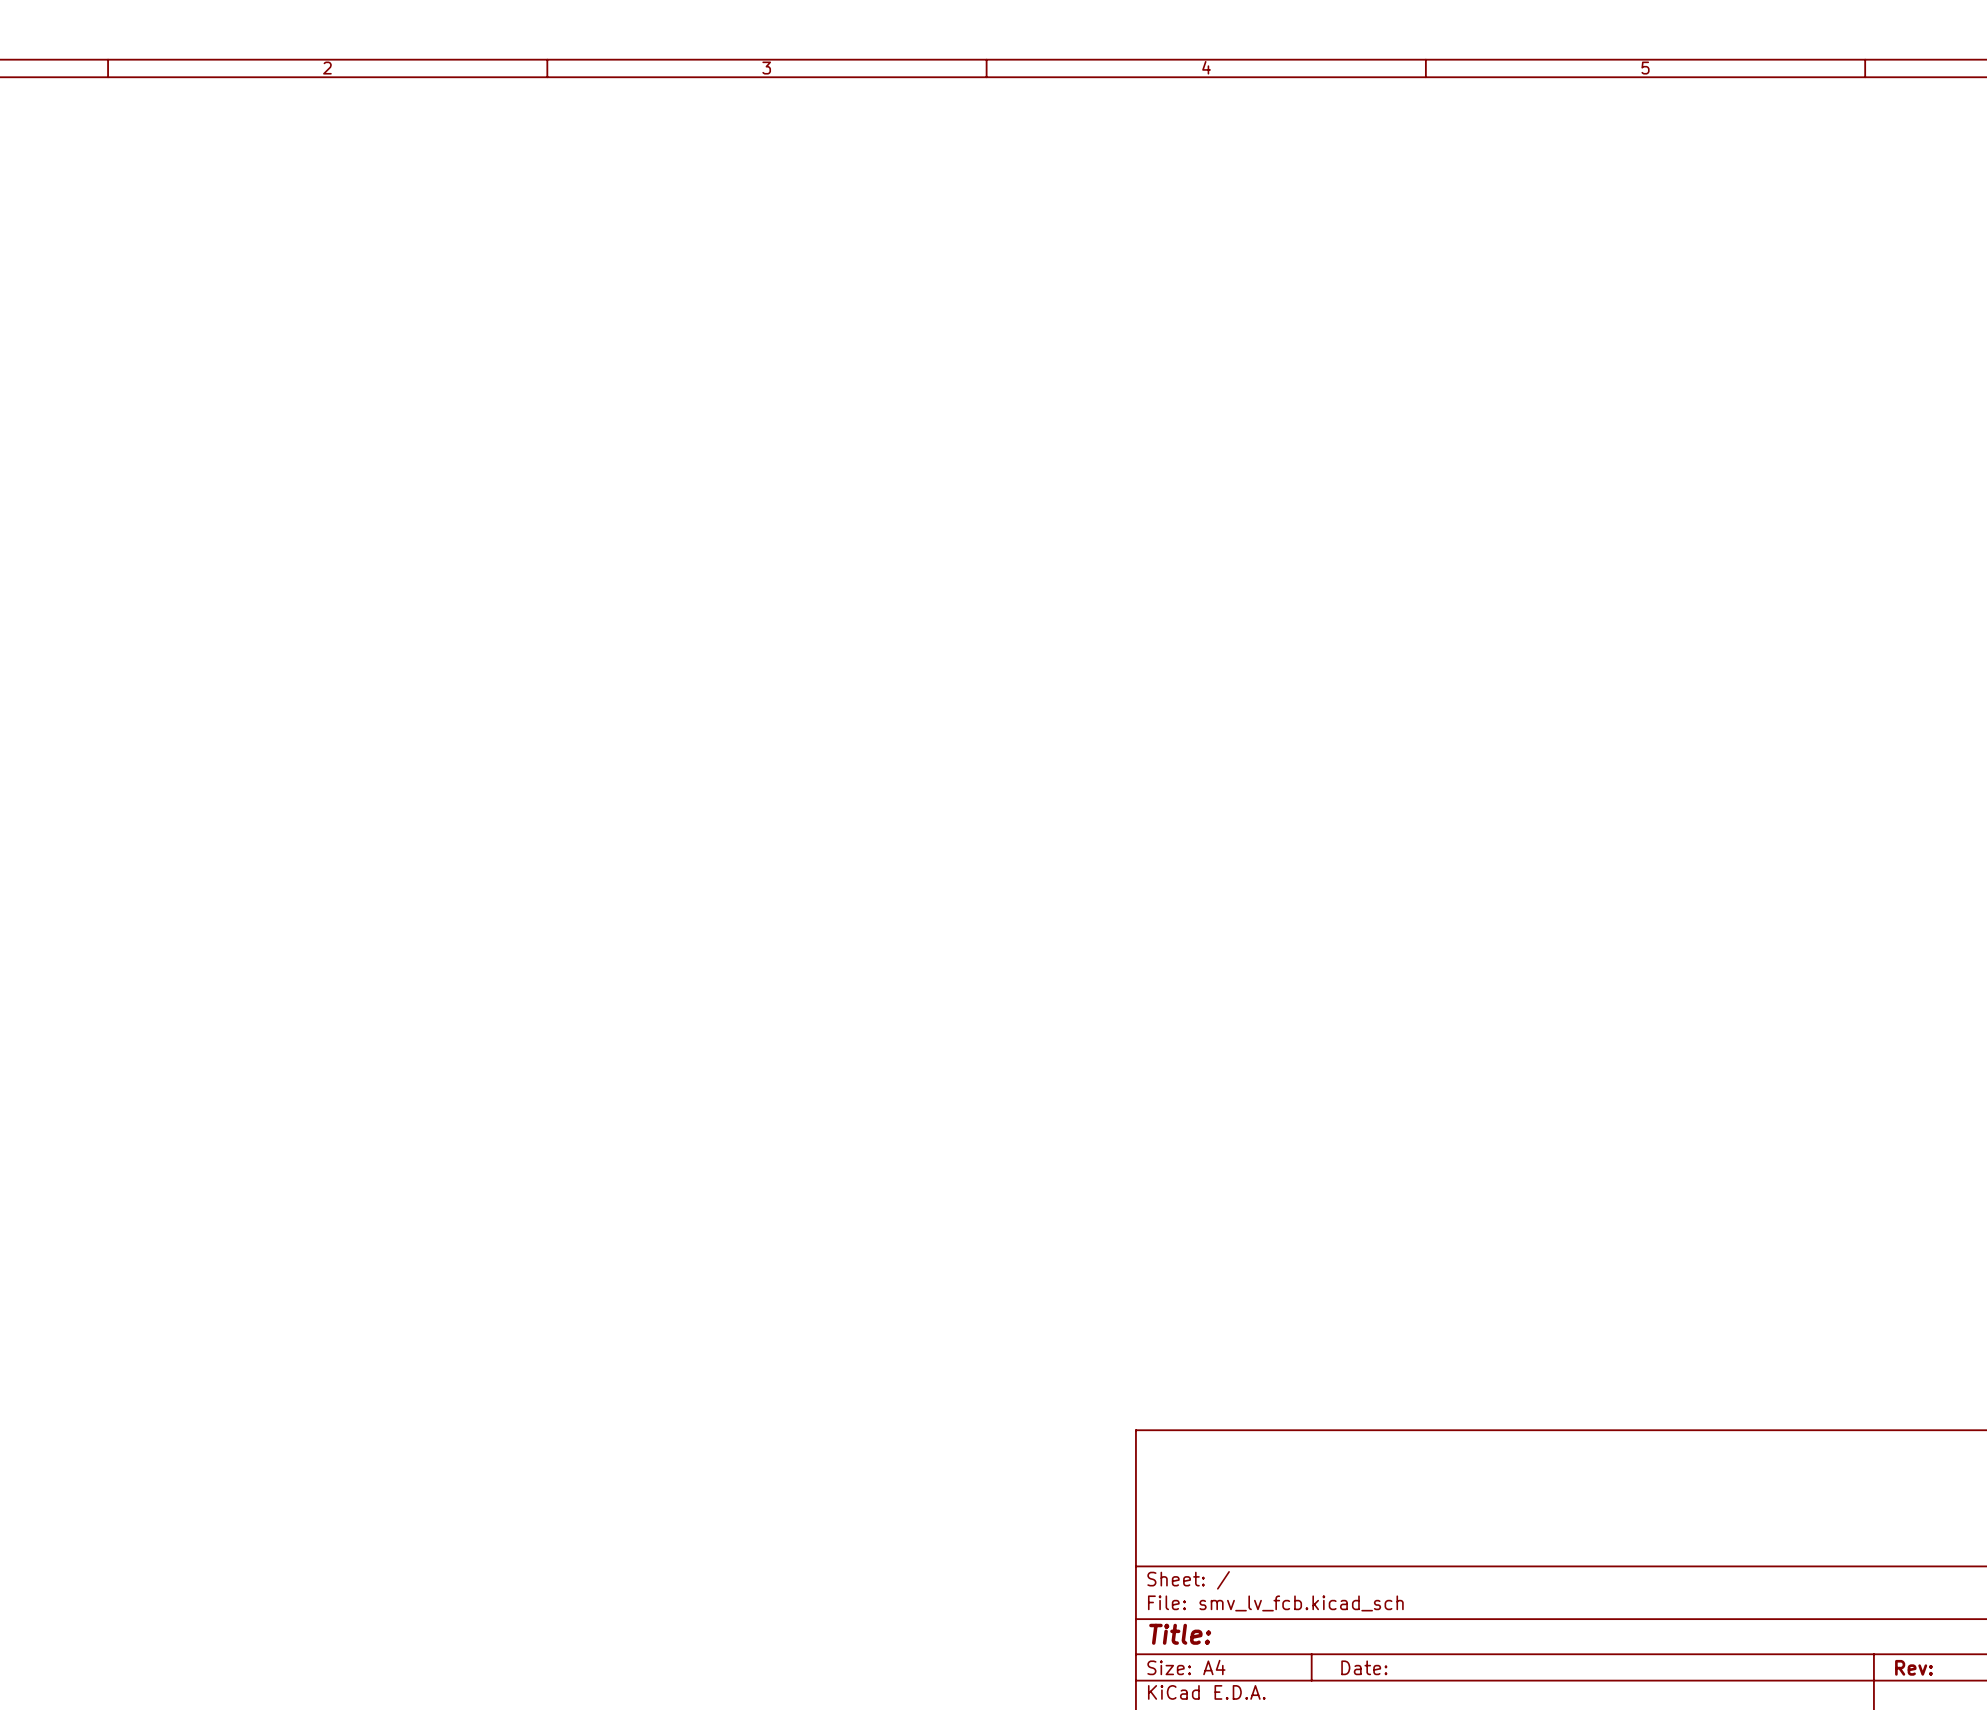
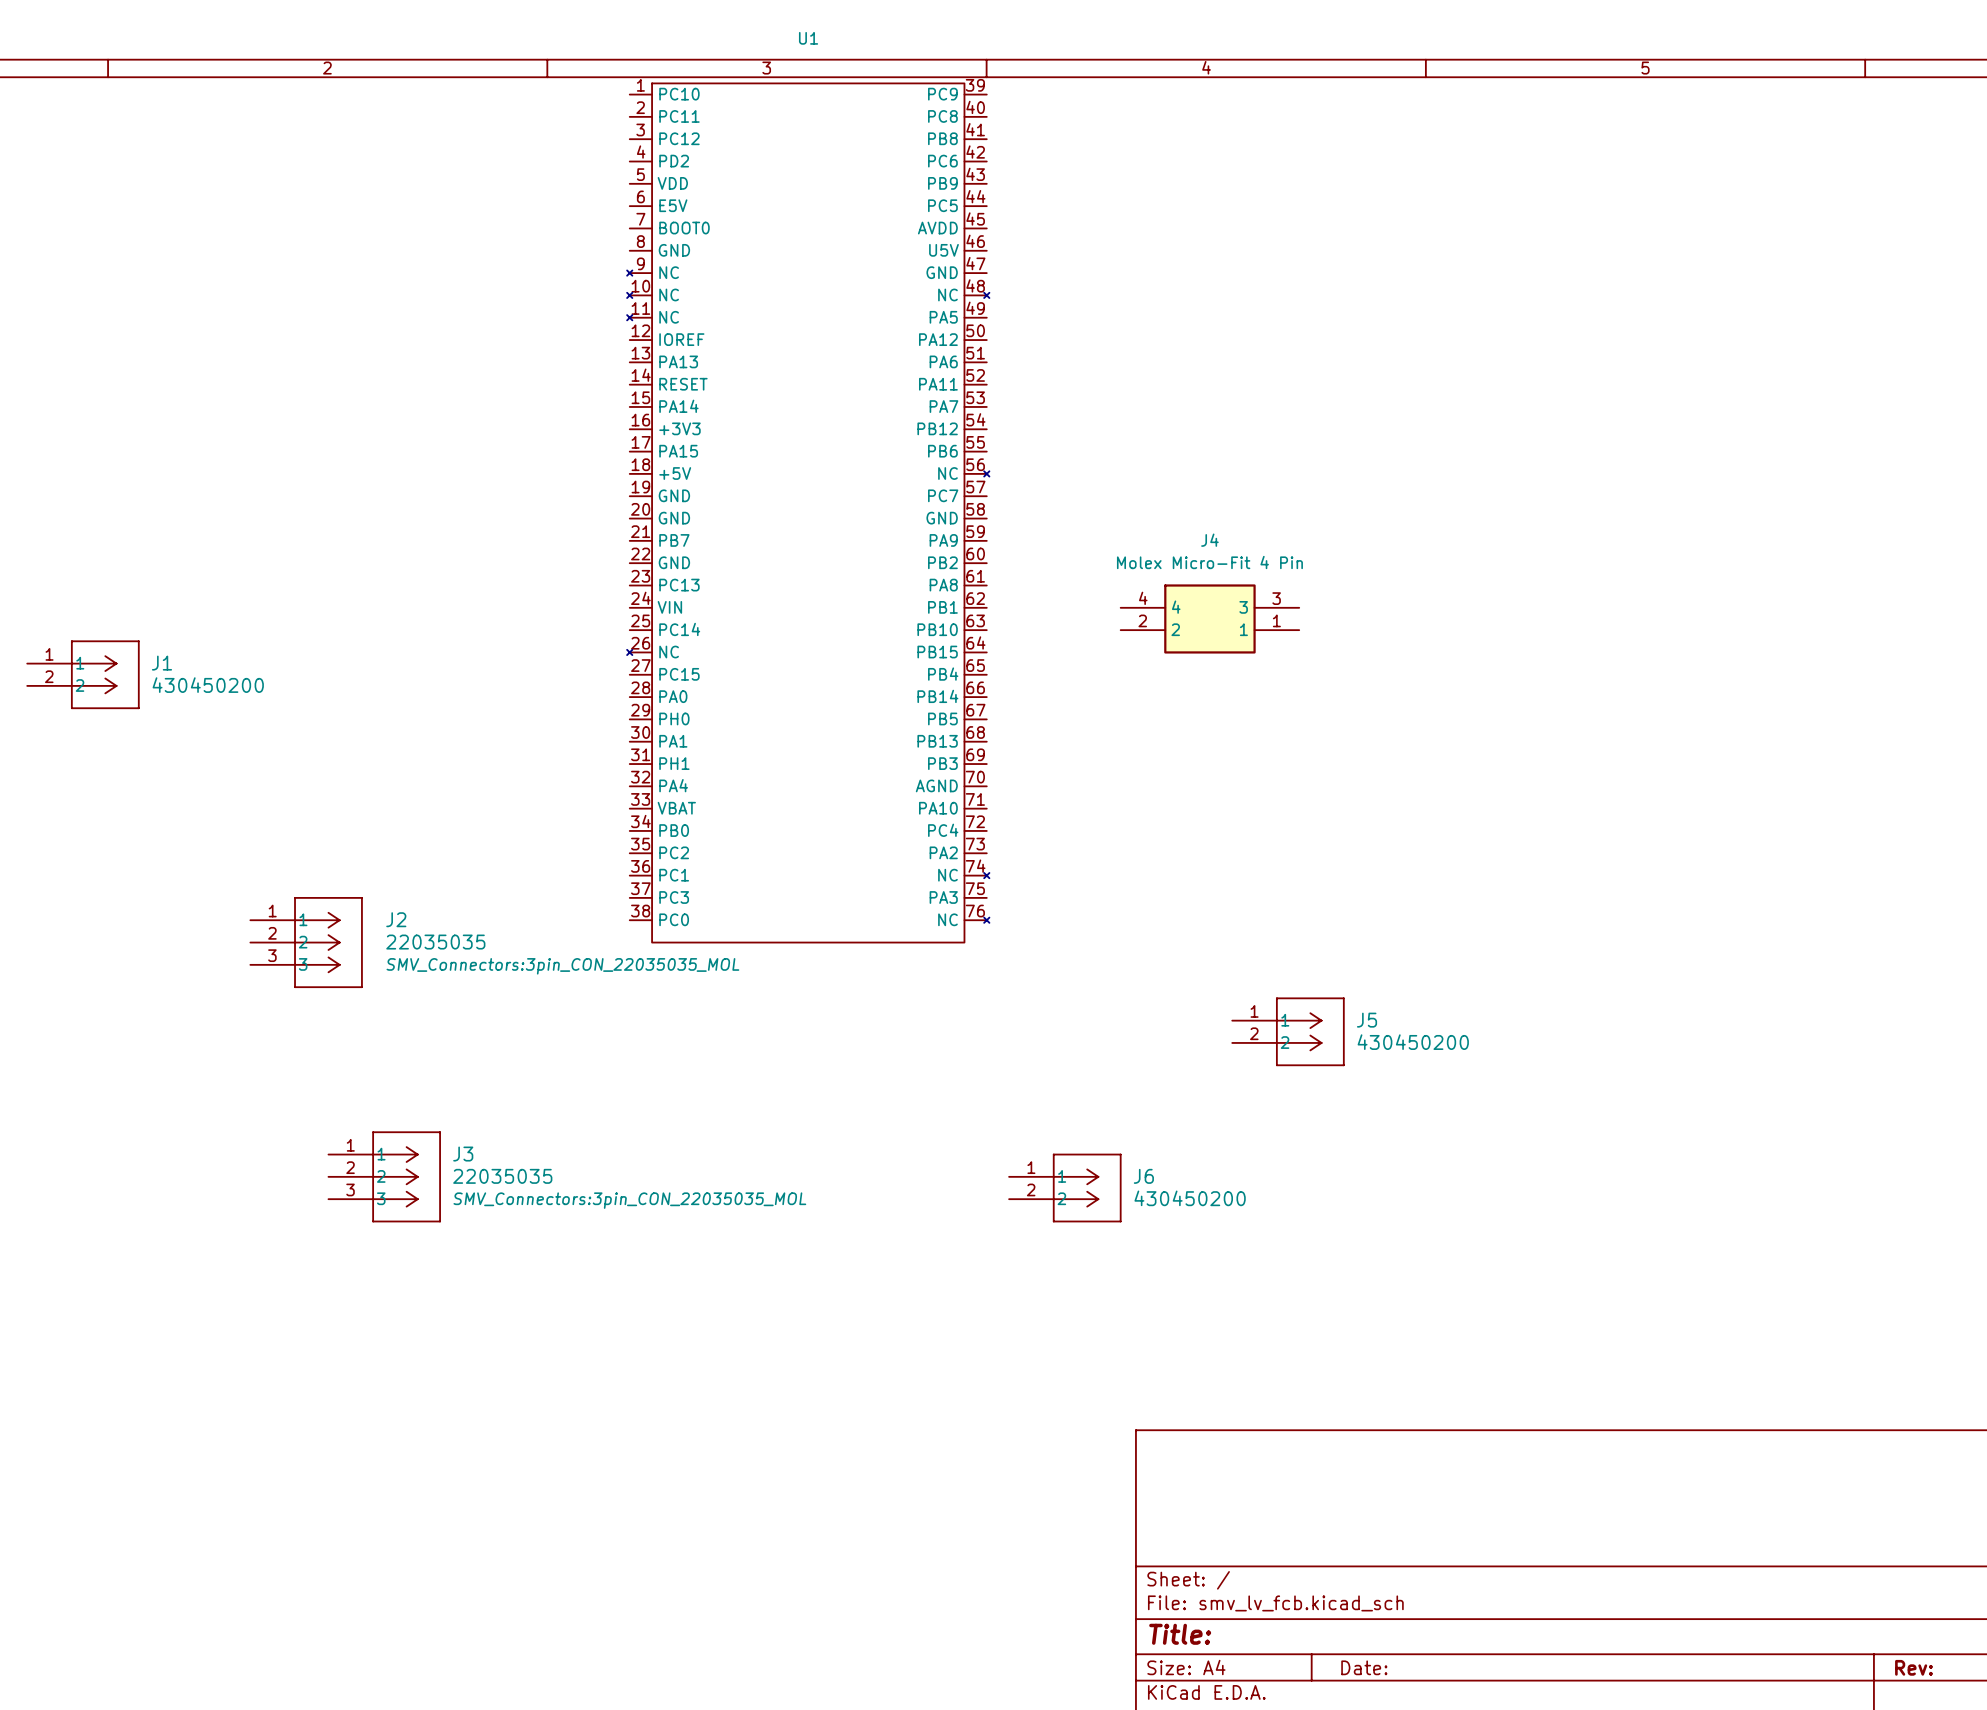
U1: none -> (808, 512)
J4: none -> Molex Micro-Fit 4 Pin (1209, 618)
J1: none -> 430450200 (83, 674)
J2: none -> 22035035 (306, 942)
J5: none -> 430450200 (1288, 1031)
J3: none -> 22035035 (384, 1176)
J6: none -> 430450200 (1065, 1188)

